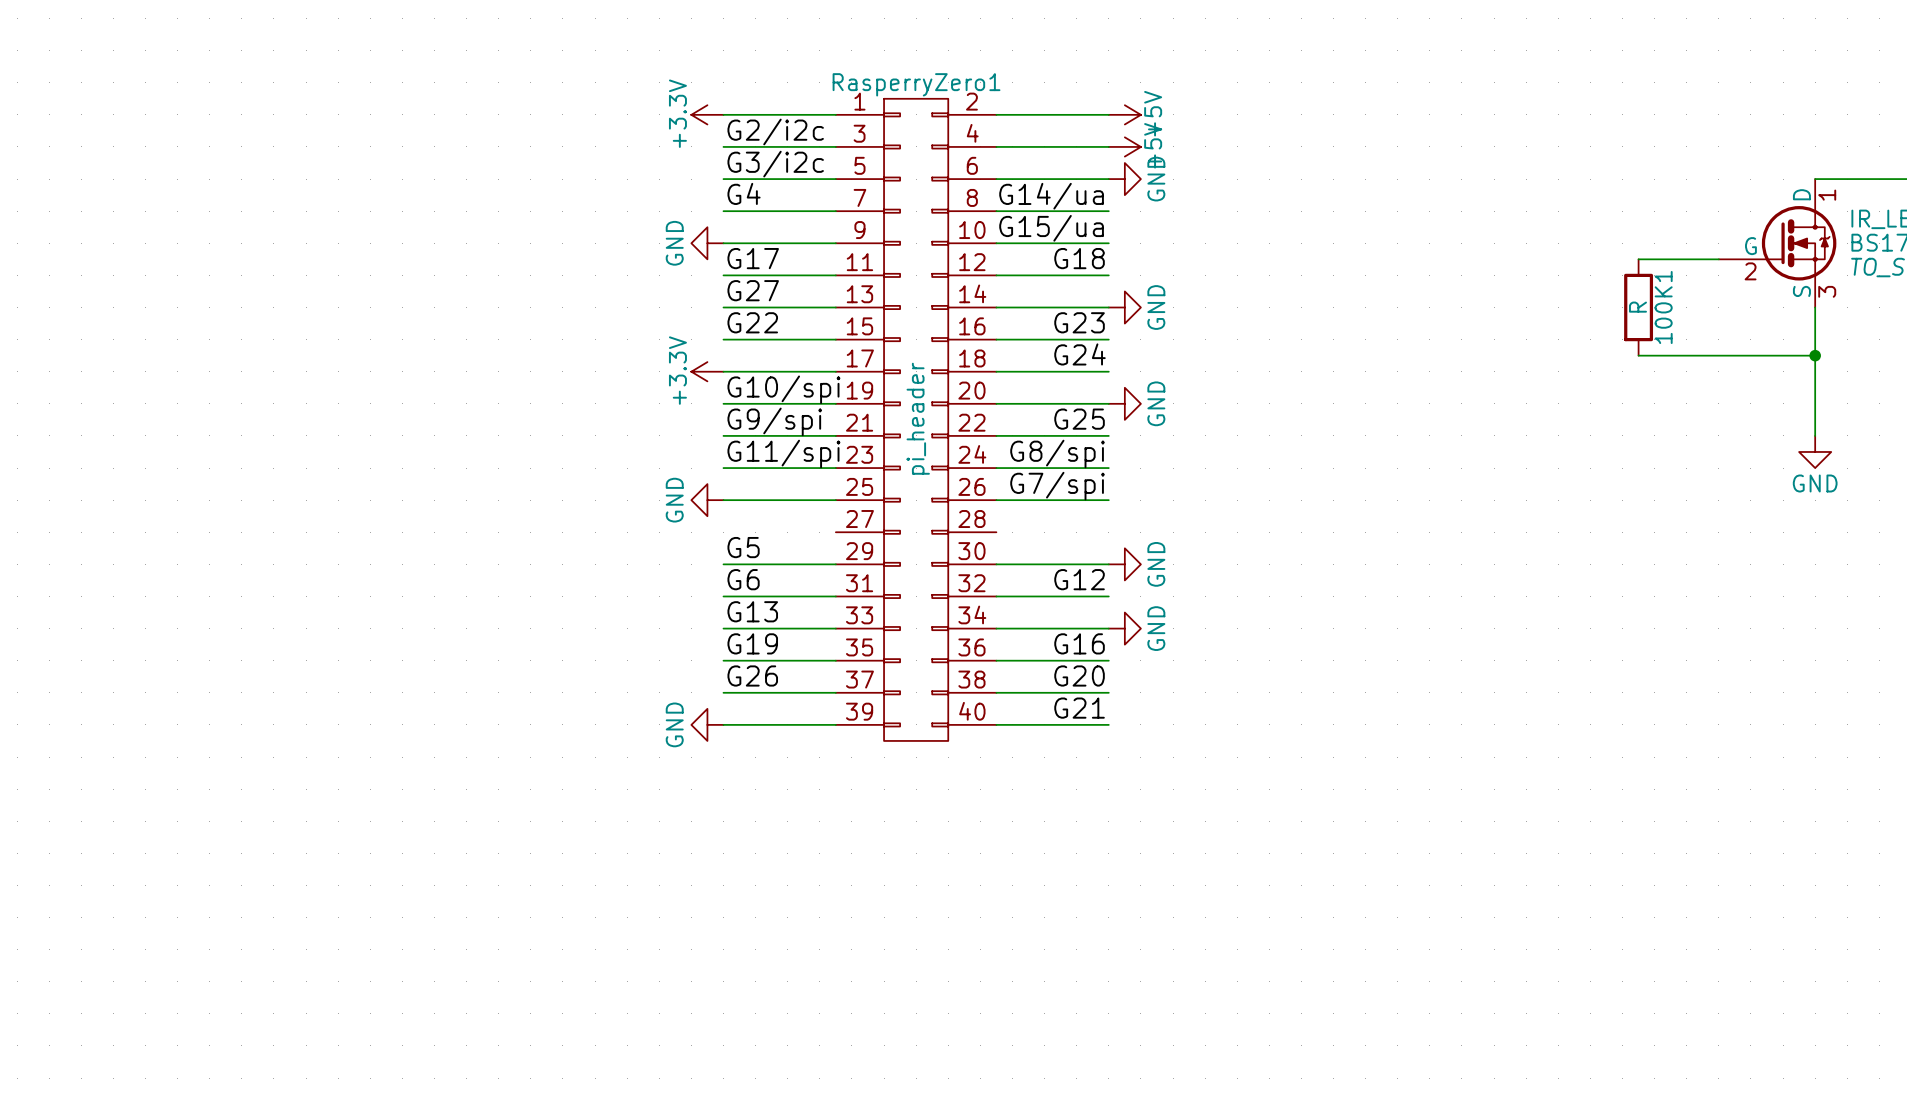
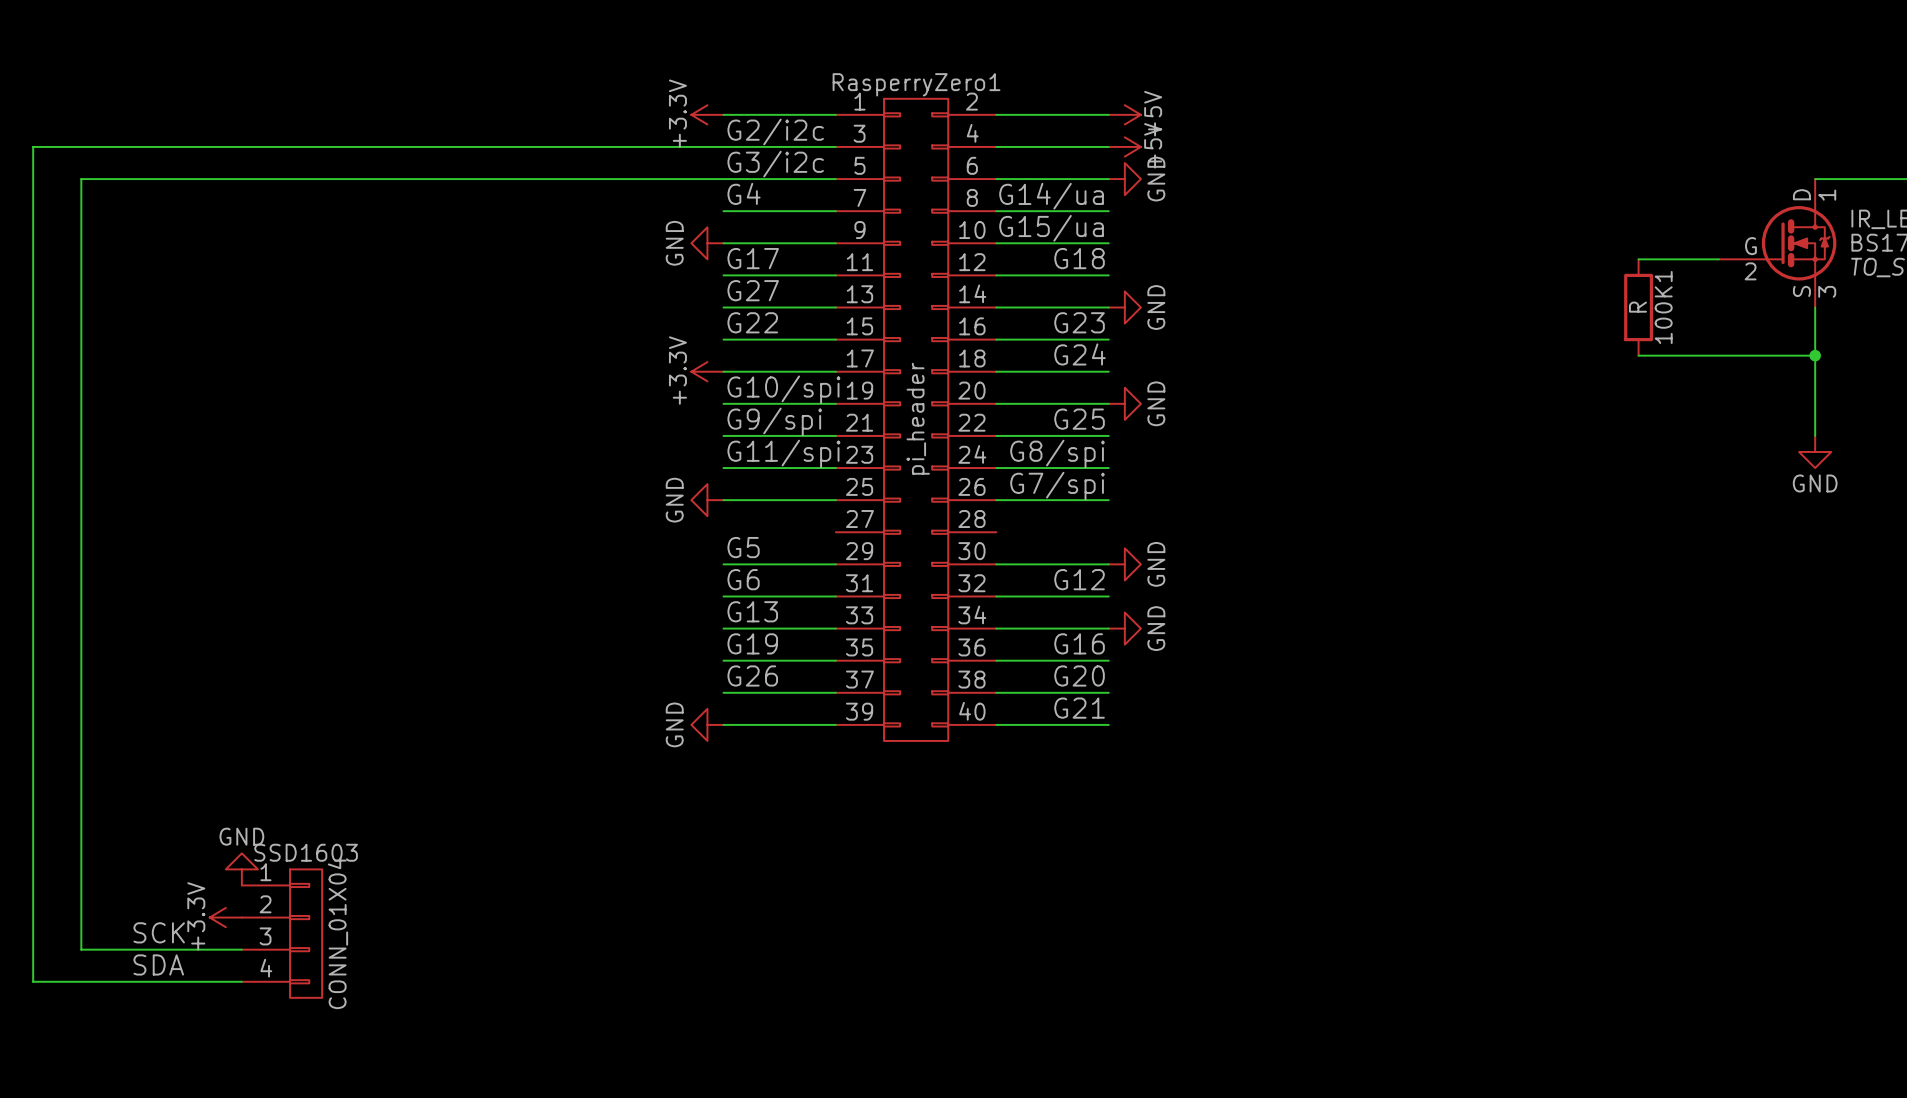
wire: none -> (723, 146) (33, 146) (33, 981) (241, 981)
wire: none -> (723, 179) (81, 179) (81, 949) (241, 949)
power symbol: none -> GND (241, 869)
power symbol: none -> +3.3V (225, 917)
label: none -> SCK (159, 932)
SSD1603: none -> CONN_01X04 (282, 933)
label: none -> SDA (158, 964)

